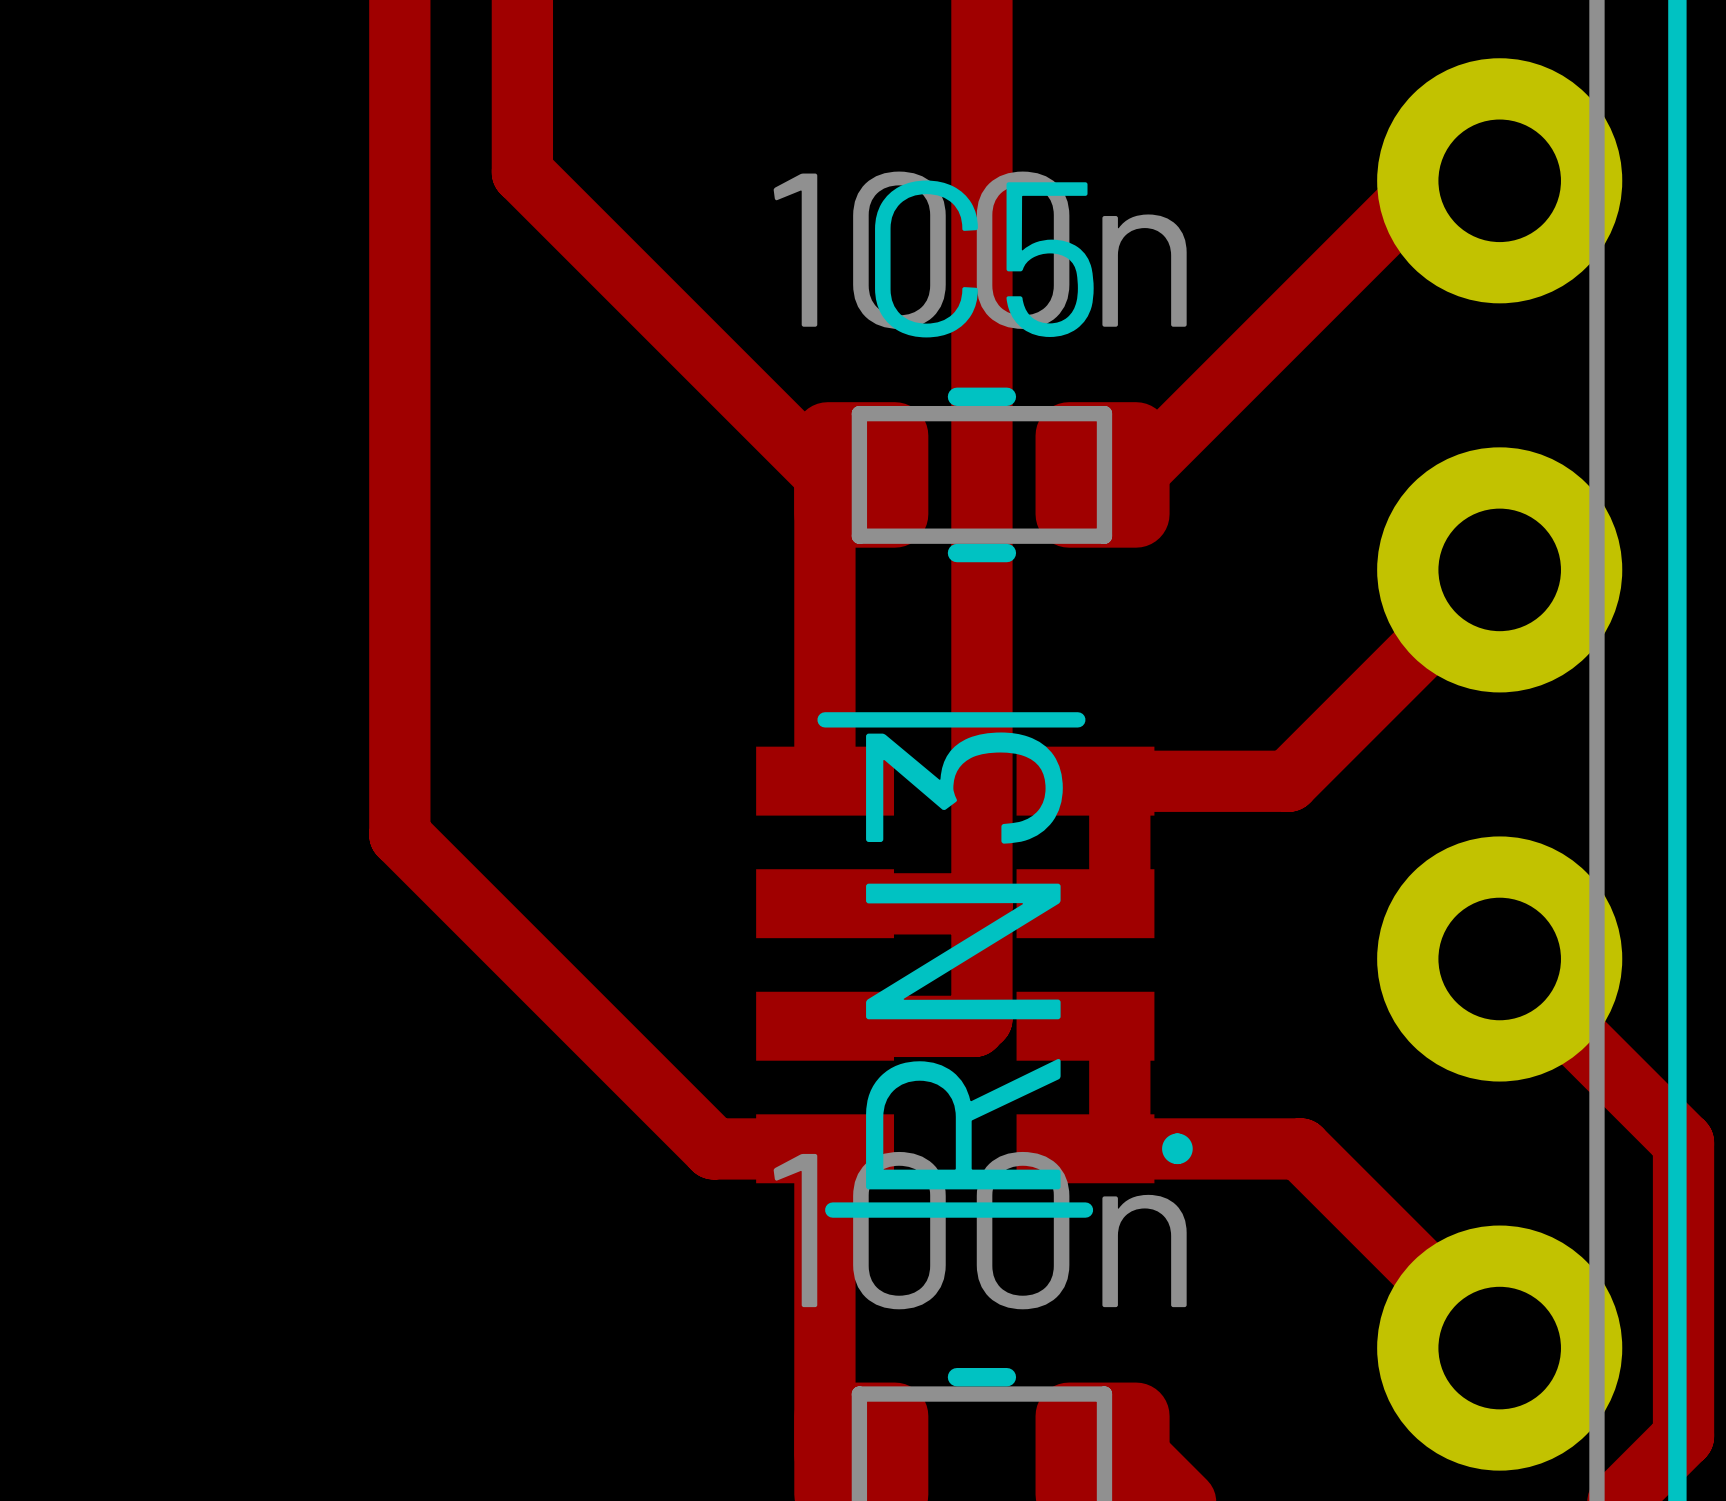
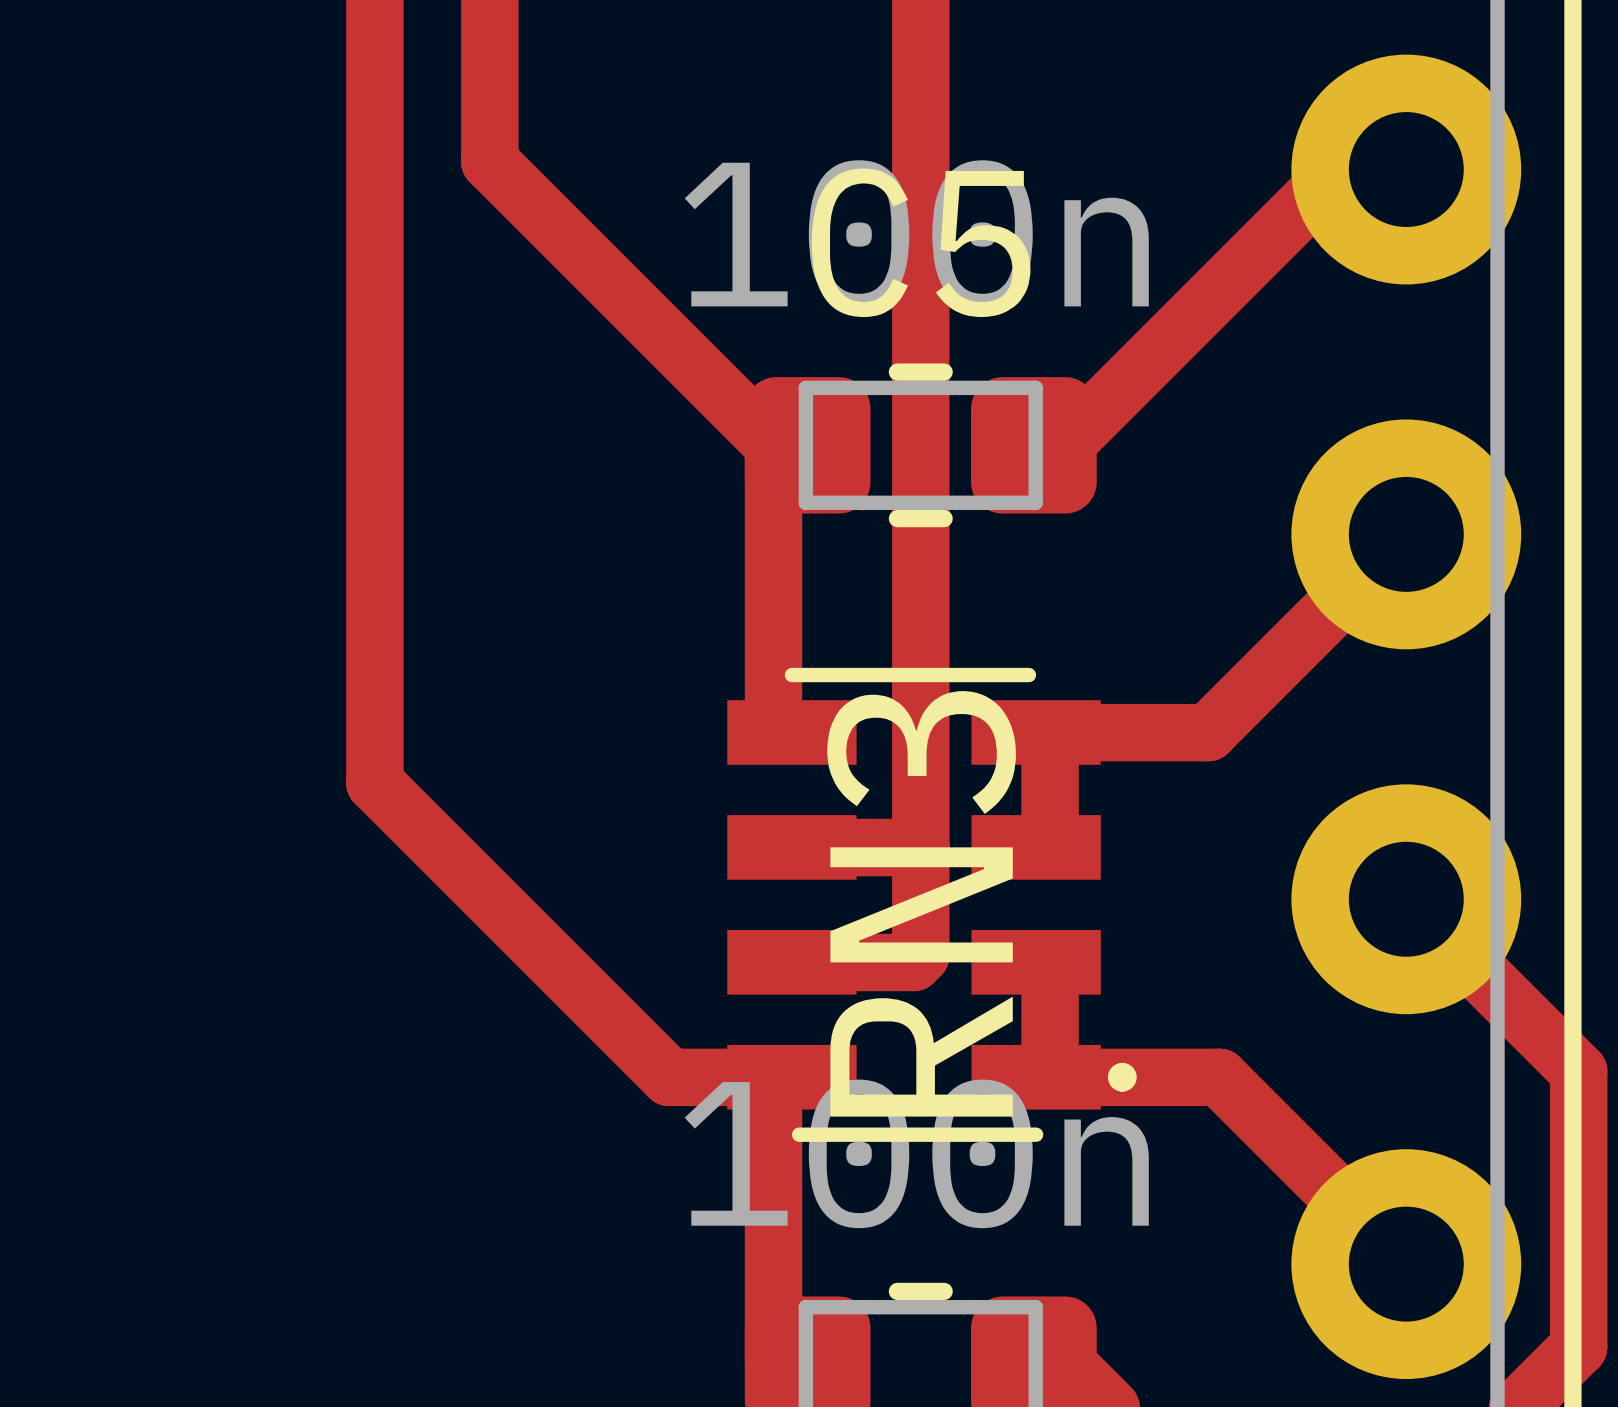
RN3 position: (974, 964) -> (931, 904)

